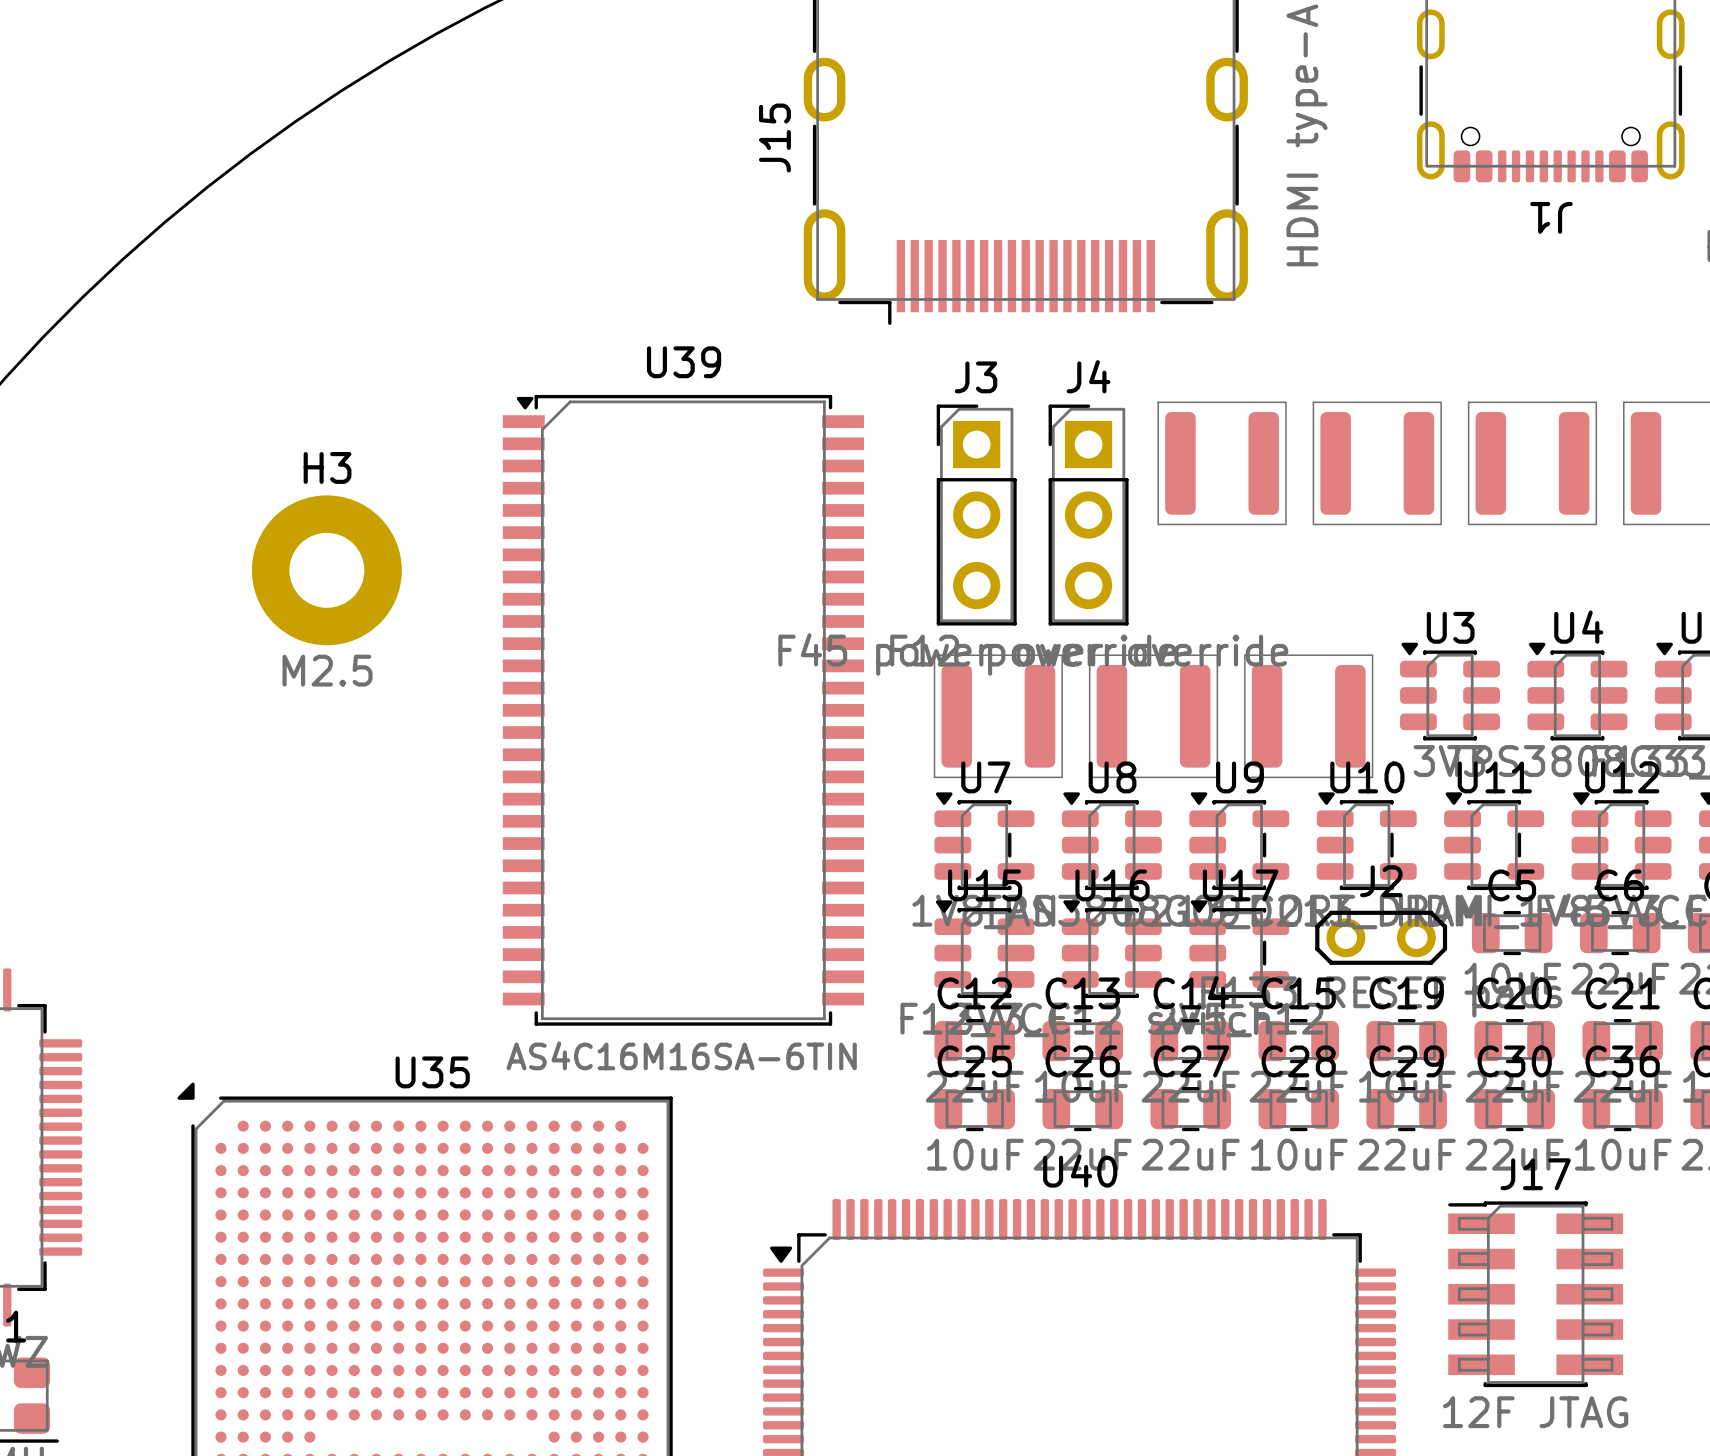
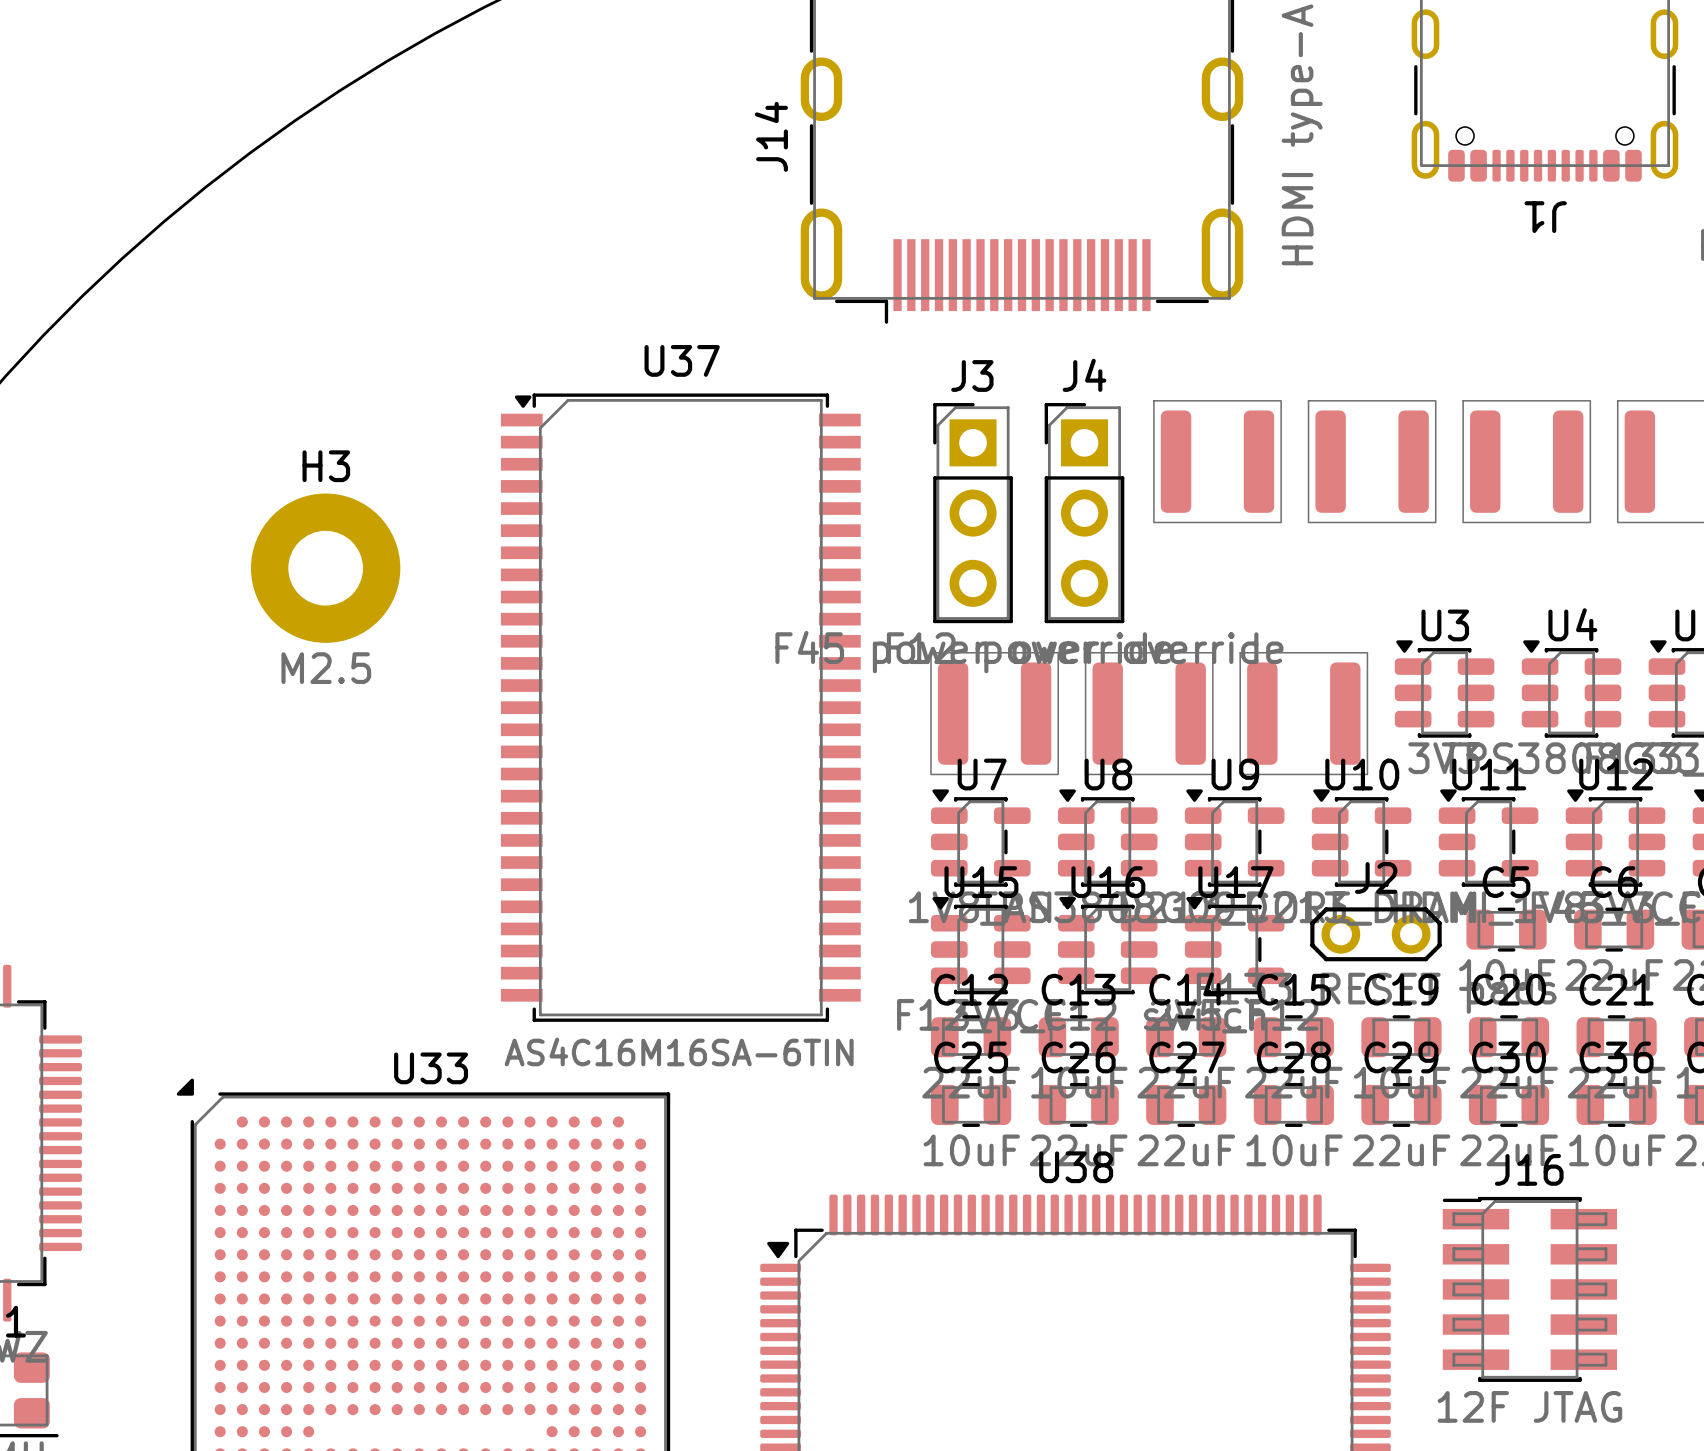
J15 name: J15 (774, 138) -> J14 (771, 136)
U39 name: U39 (684, 362) -> U37 (682, 360)
U35 name: U35 (432, 1072) -> U33 (431, 1068)
U40 name: U40 (1080, 1170) -> U38 (1076, 1167)
J17 name: J17 (1535, 1174) -> J16 (1529, 1169)

